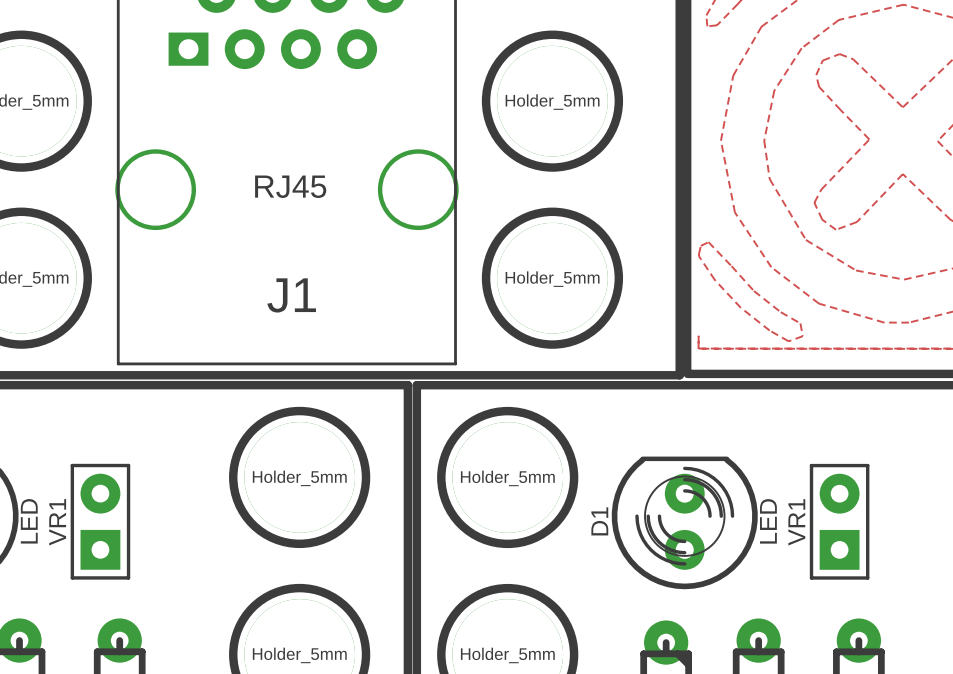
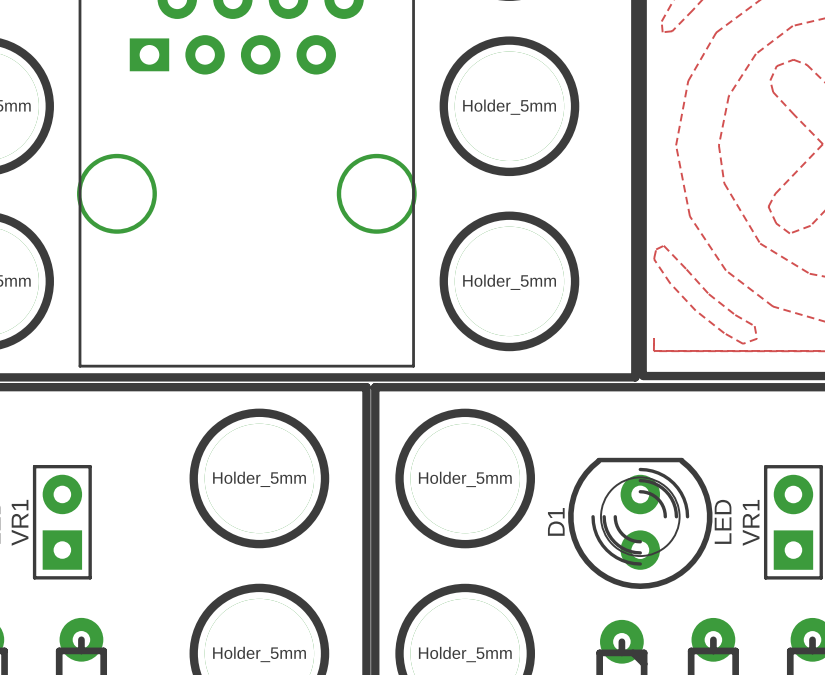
J1 value: RJ45 (290, 186) -> none
J1 name: J1 (291, 295) -> none

